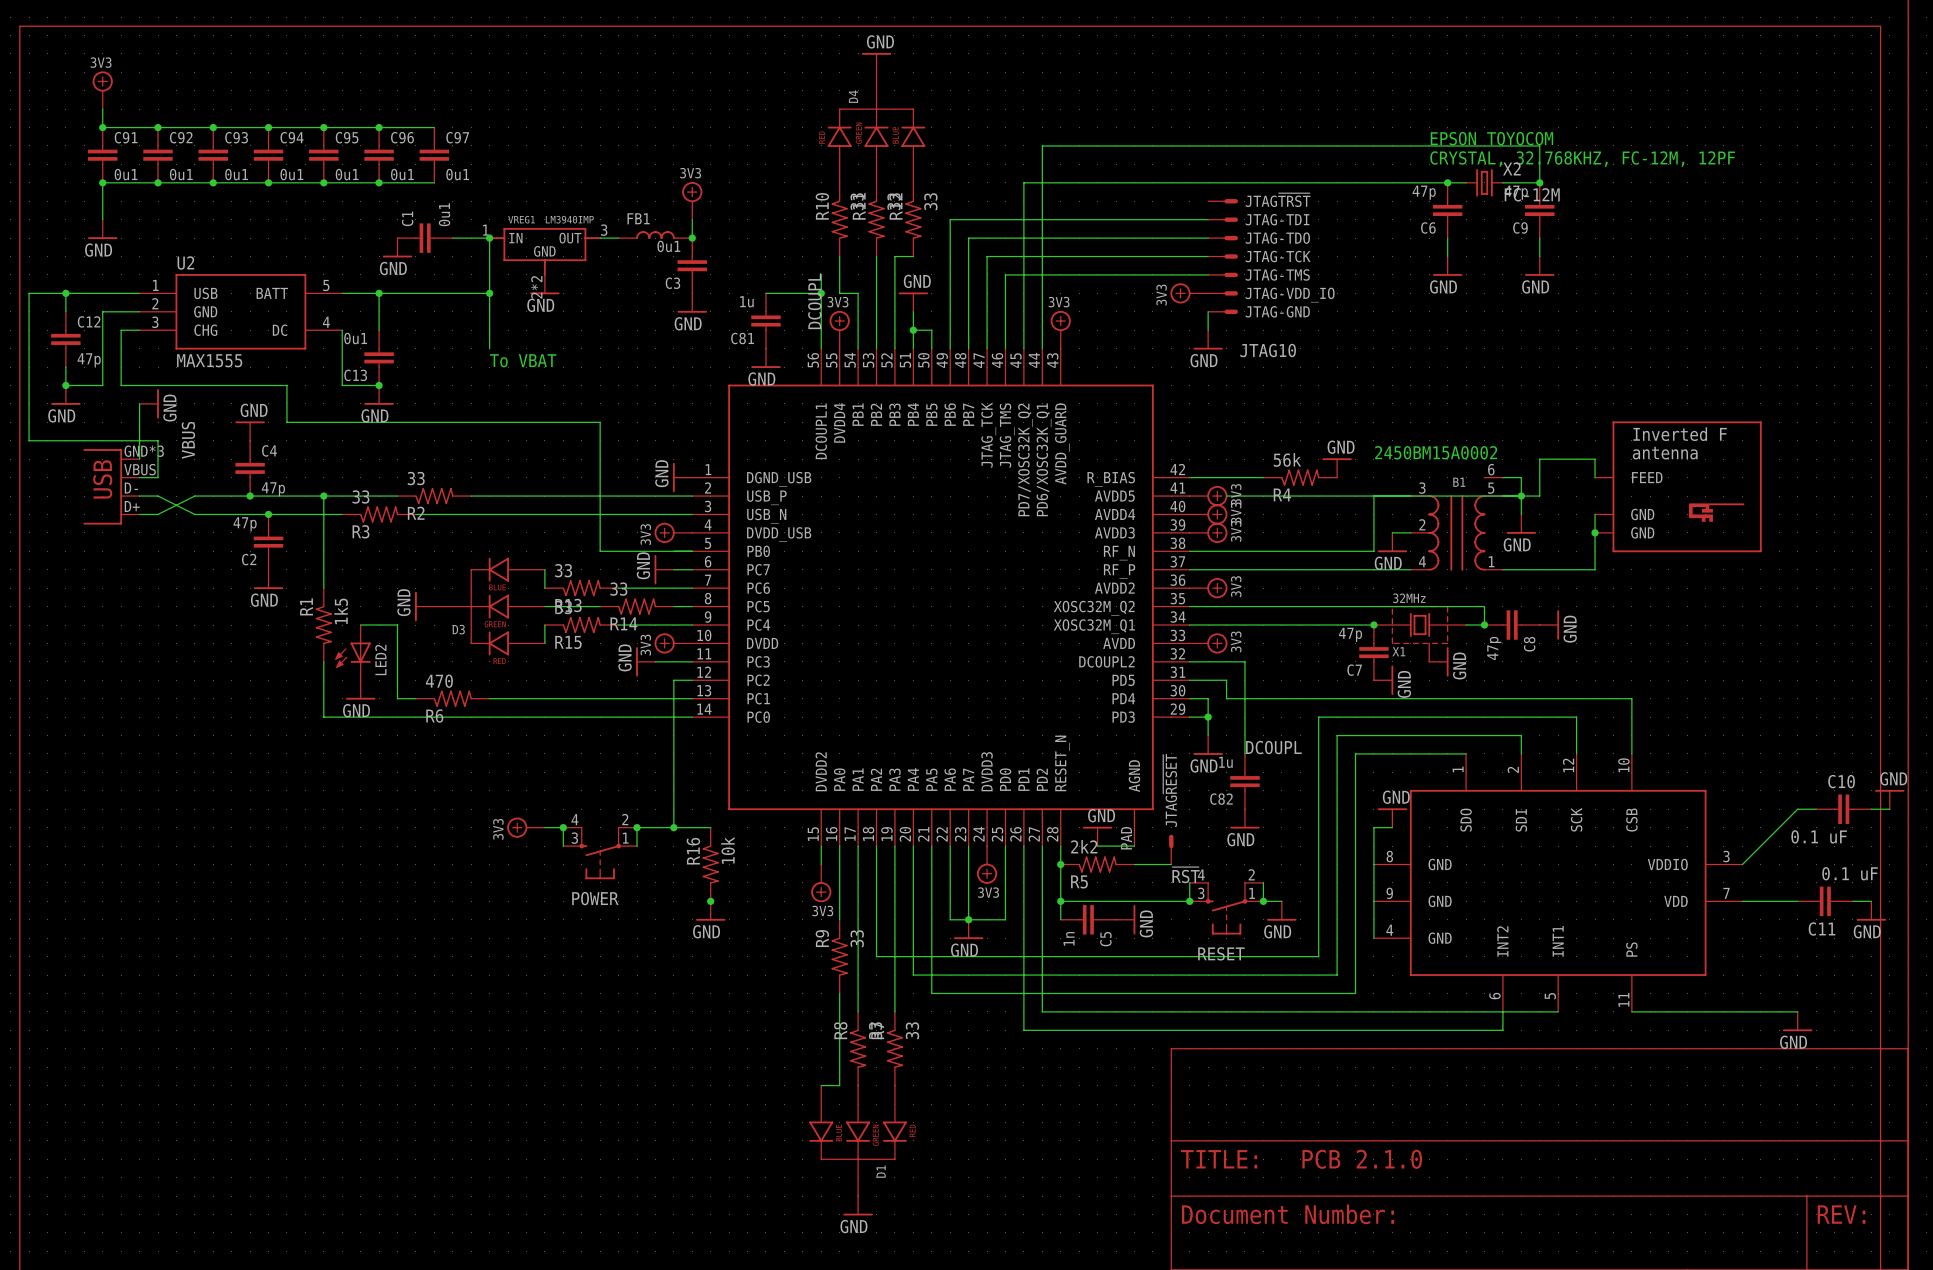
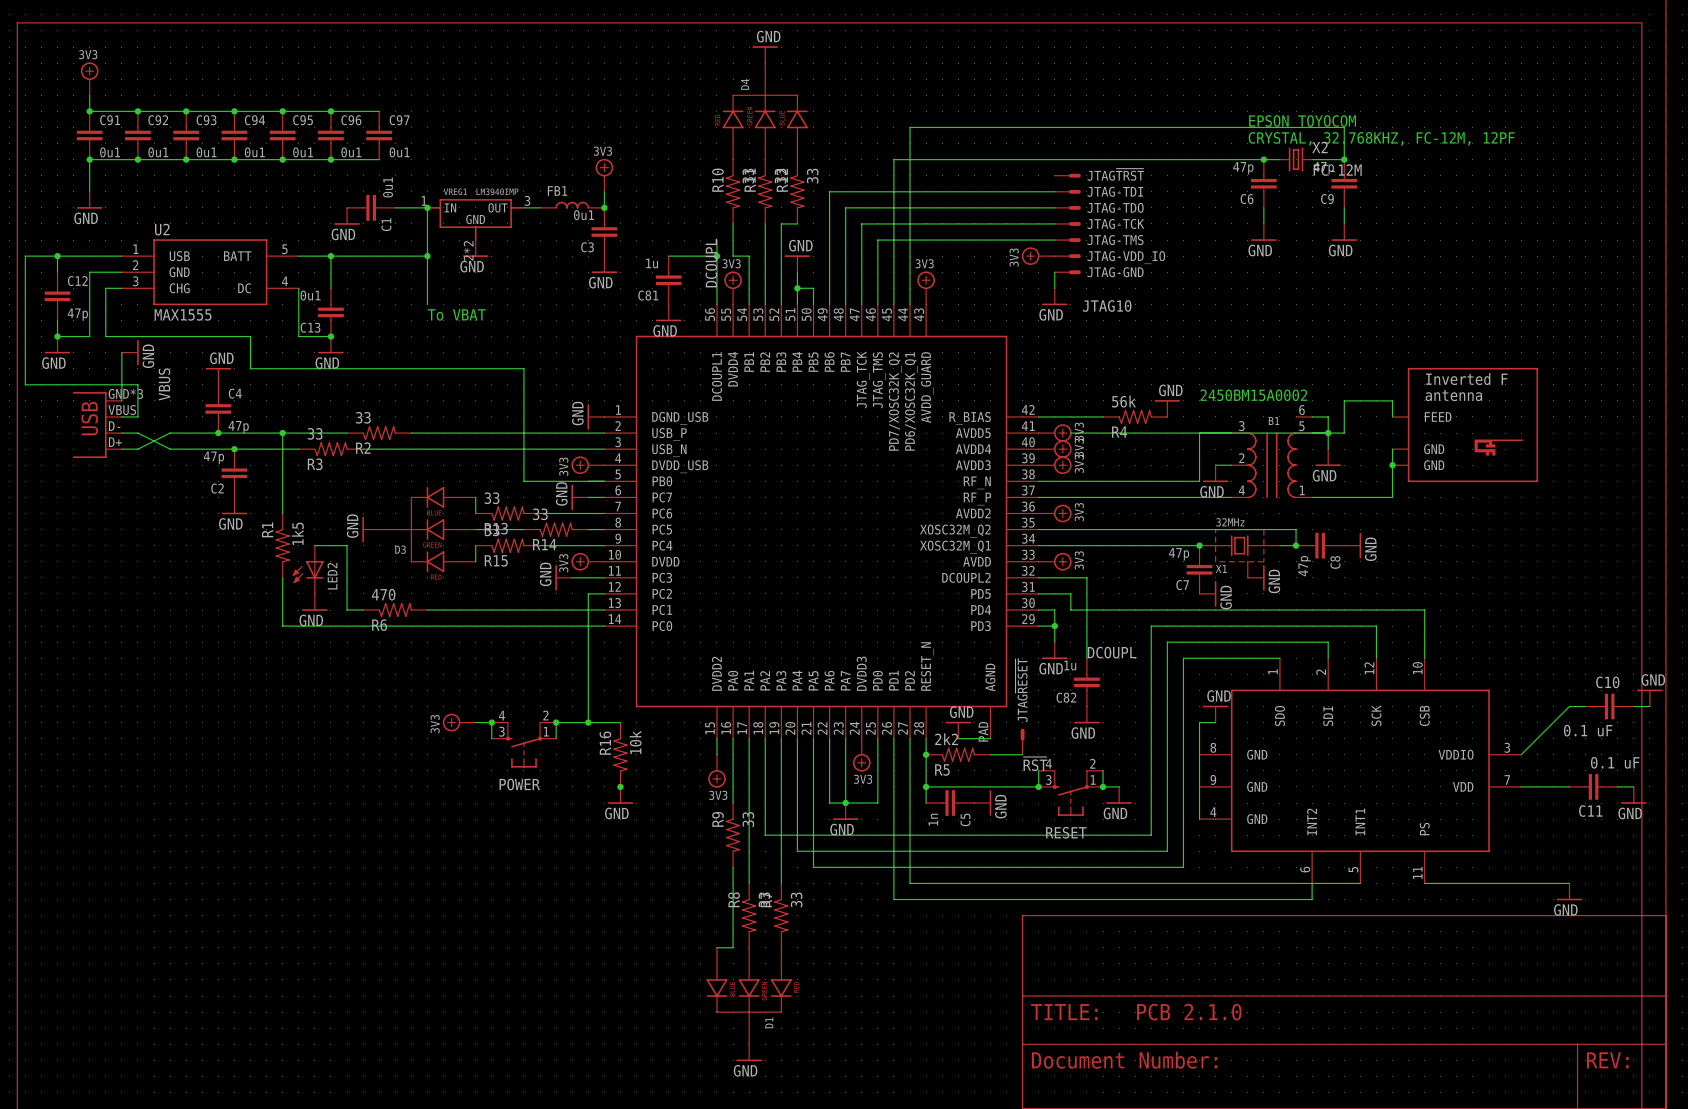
C1 name position: C1 (407, 218) -> C1 (386, 224)

